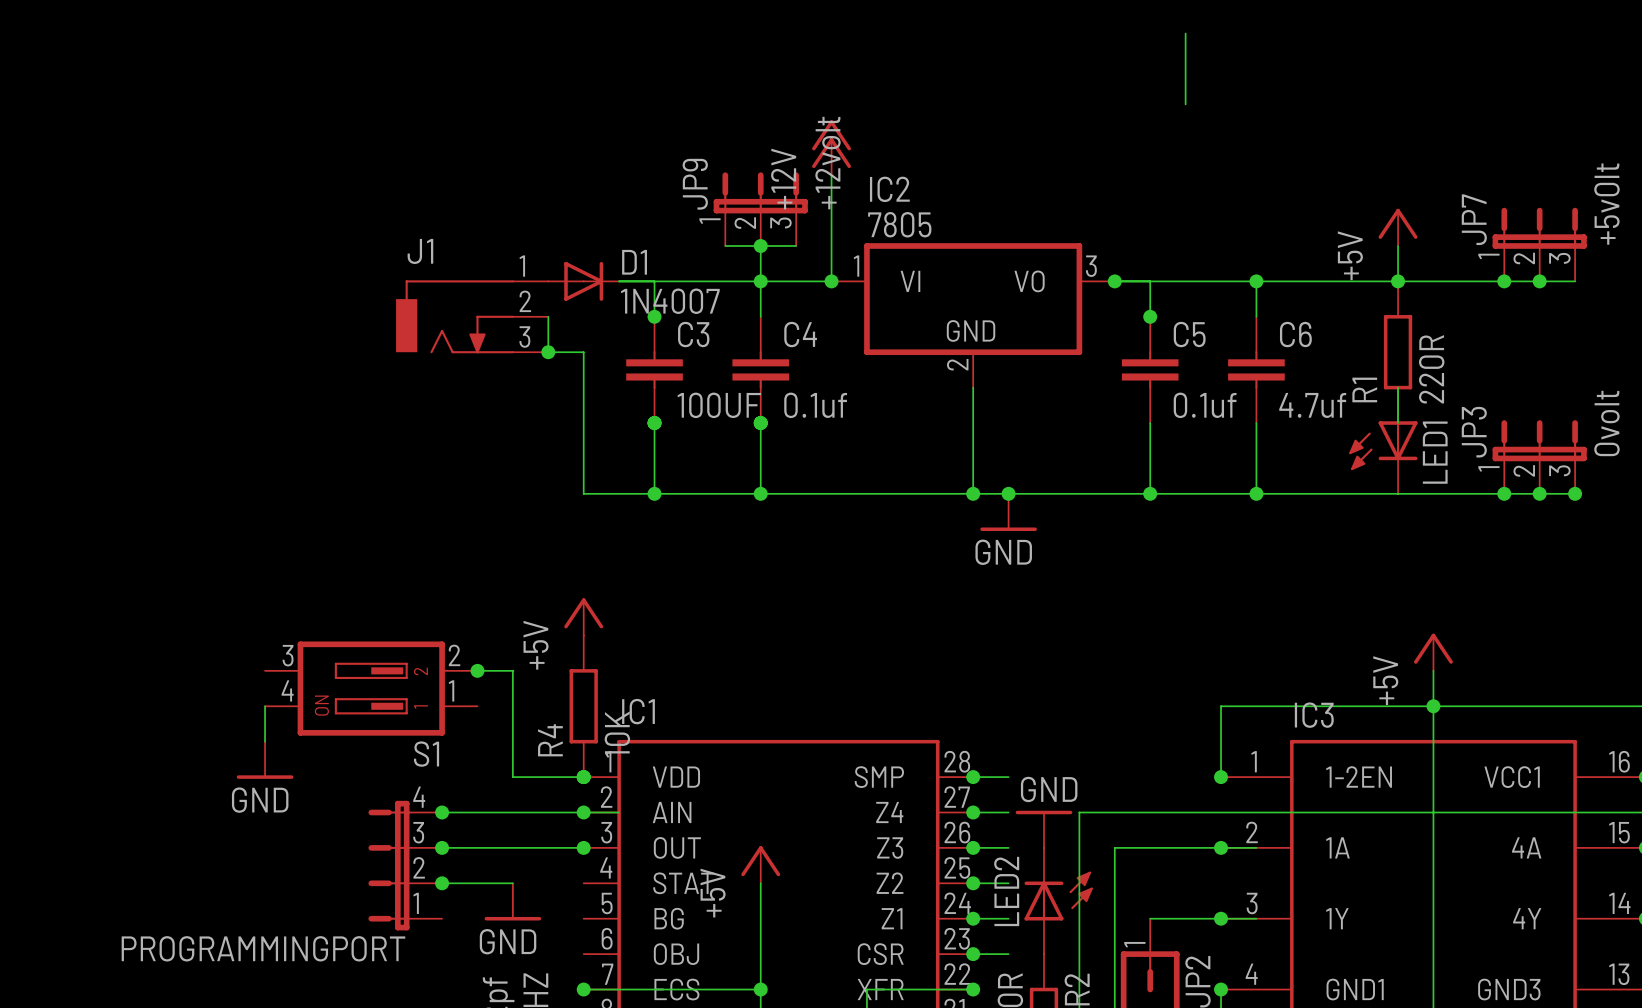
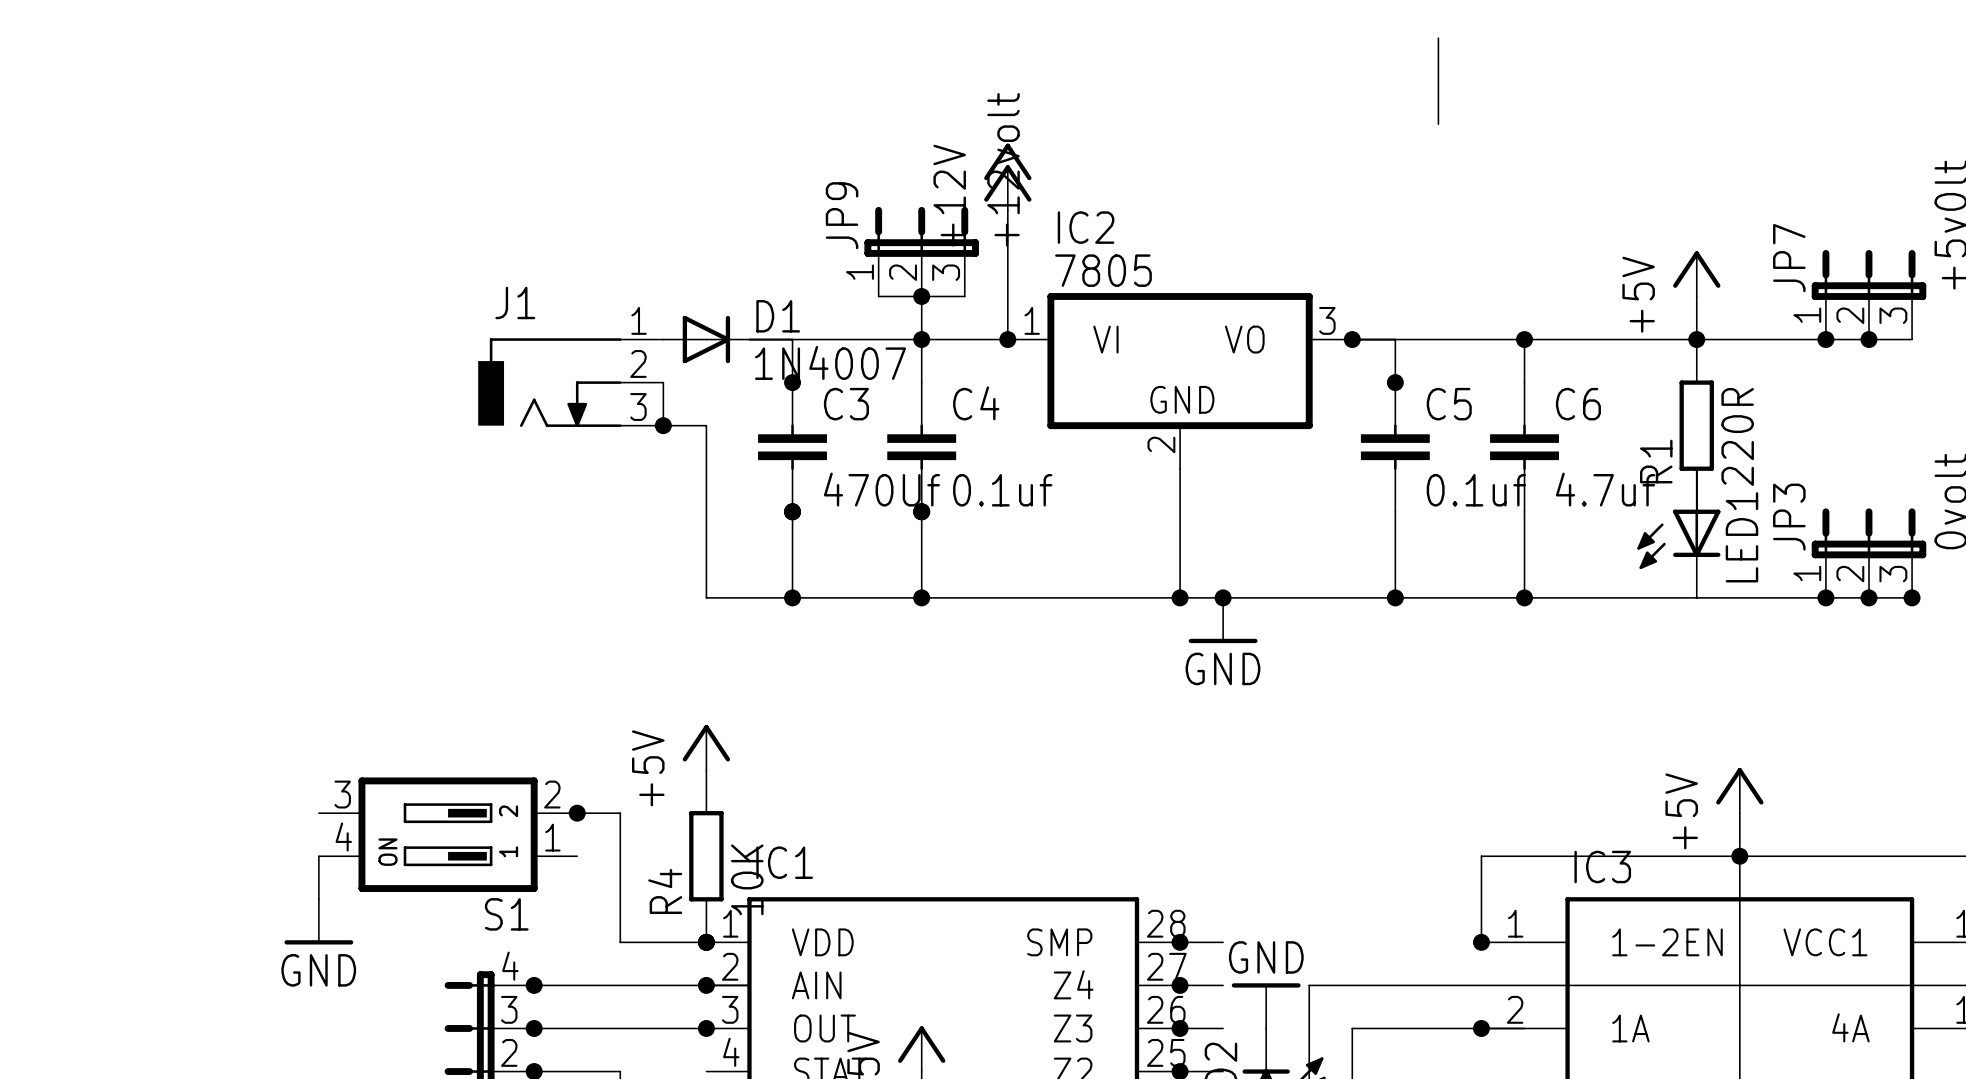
C3 value: 100UF (719, 405) -> 470Uf (881, 489)

